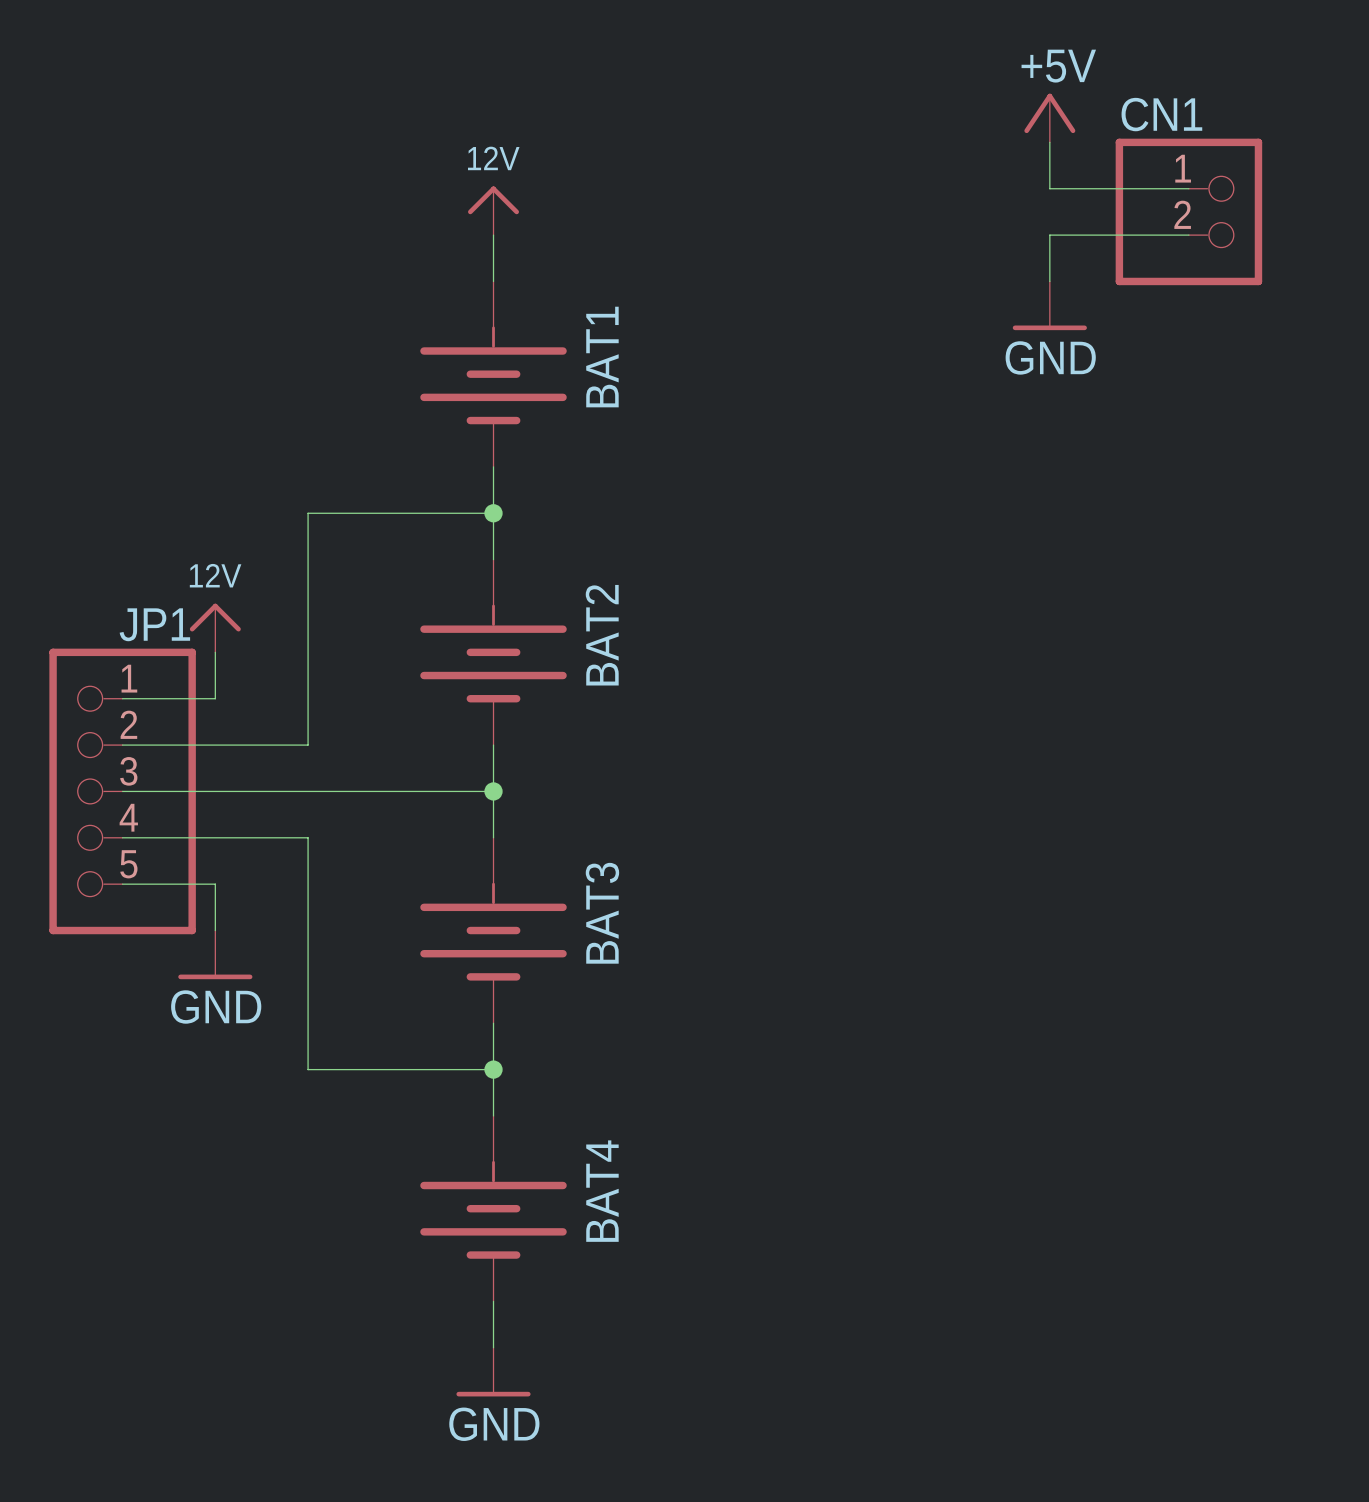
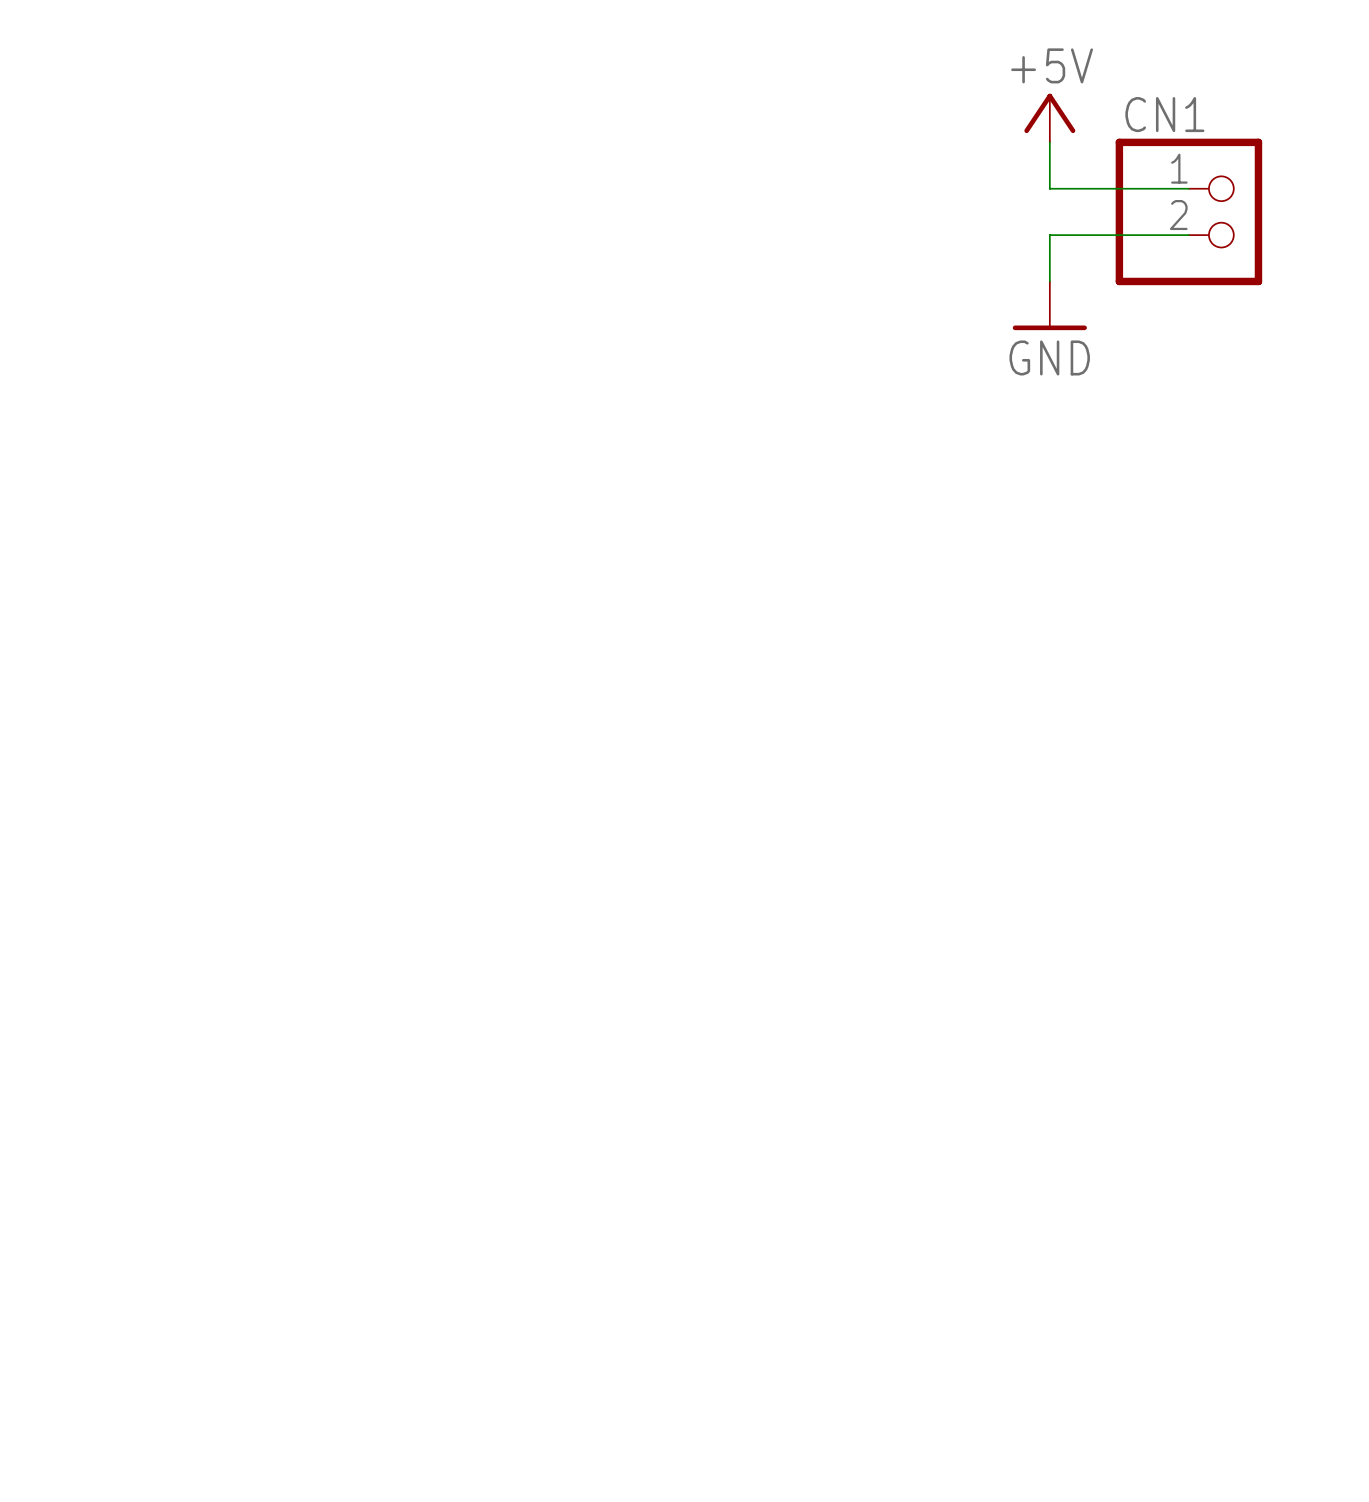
power symbol: 12V (493, 210) -> none
wire: (493, 235) (493, 281) -> none
BAT1: (493, 374) -> none
wire: (493, 466) (493, 559) -> none
wire: (493, 513) (308, 513) (308, 745) (122, 745) -> none
junction: (493, 513) -> none
power symbol: 12V (215, 628) -> none
wire: (215, 652) (215, 698) (122, 698) -> none
BAT2: (493, 652) -> none
wire: (493, 745) (493, 837) -> none
wire: (122, 791) (493, 791) -> none
JP1: (122, 791) -> none
junction: (493, 791) -> none
wire: (122, 837) (308, 837) (308, 1069) (493, 1069) -> none
wire: (122, 884) (215, 884) (215, 930) -> none
BAT3: (493, 930) -> none
power symbol: GND (215, 954) -> none
wire: (493, 1023) (493, 1115) -> none
junction: (493, 1069) -> none
BAT4: (493, 1208) -> none
wire: (493, 1301) (493, 1347) -> none
power symbol: GND (493, 1372) -> none

